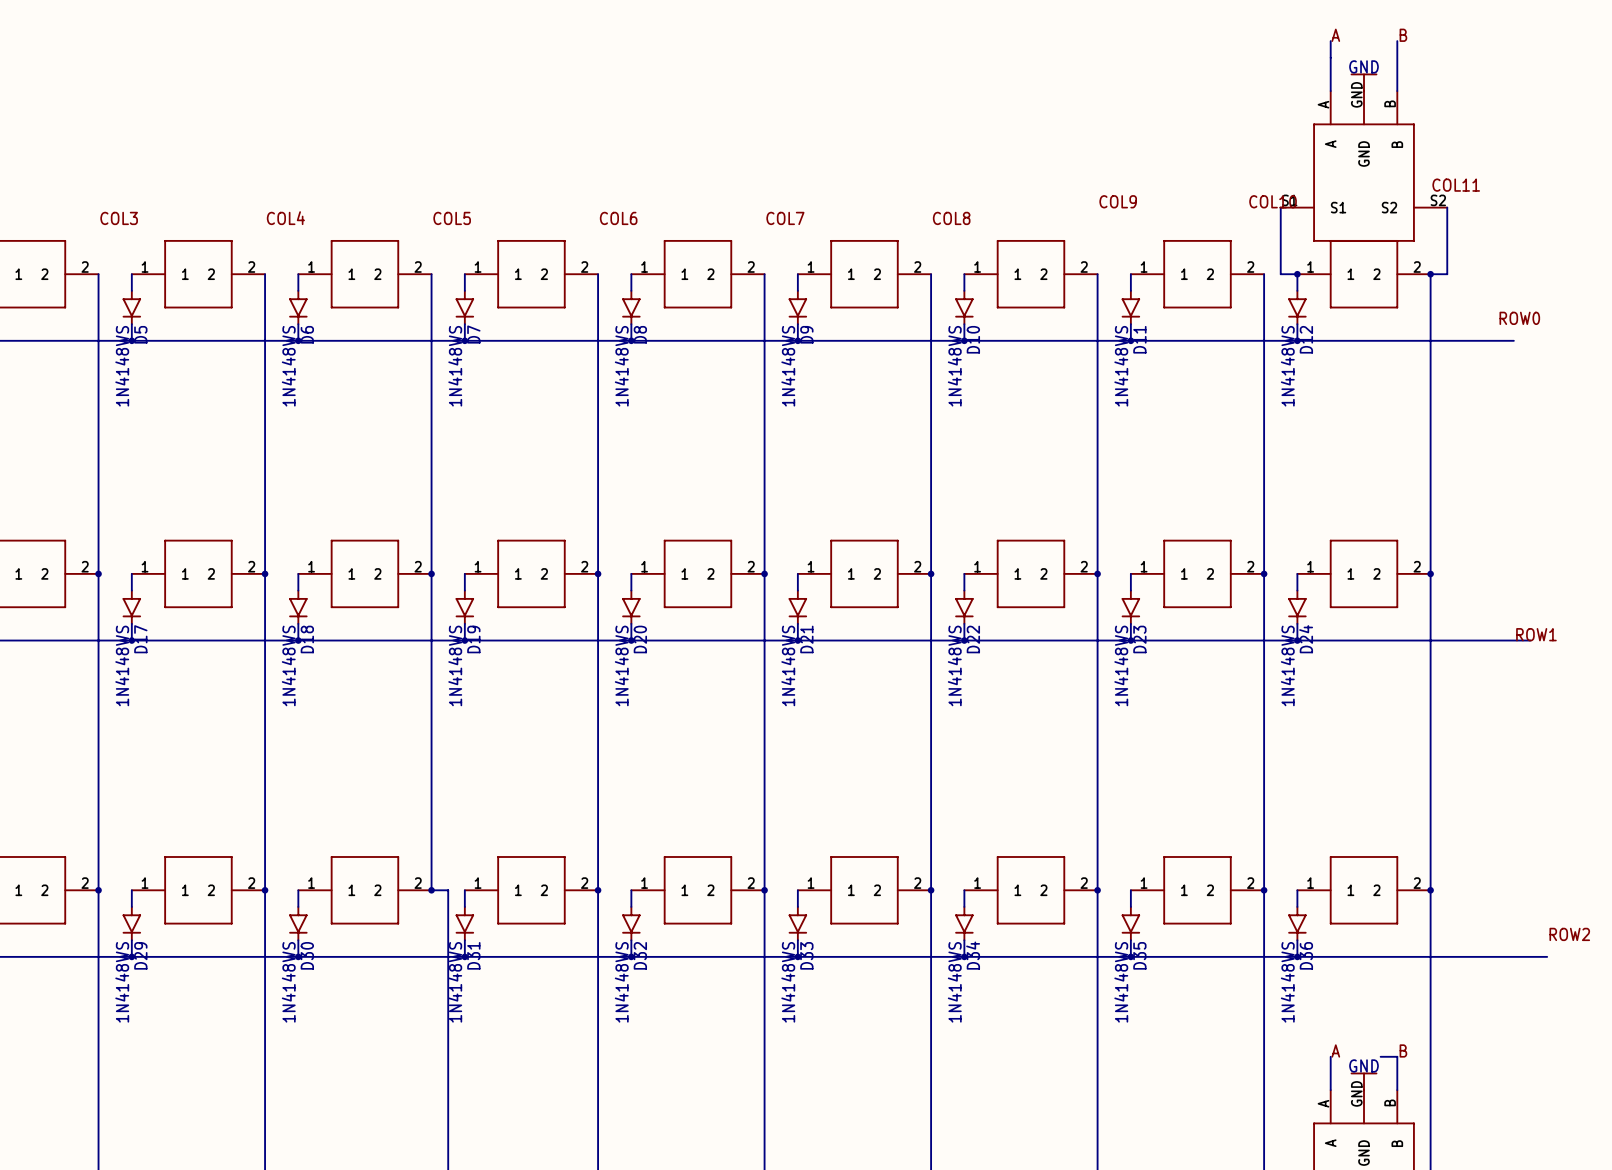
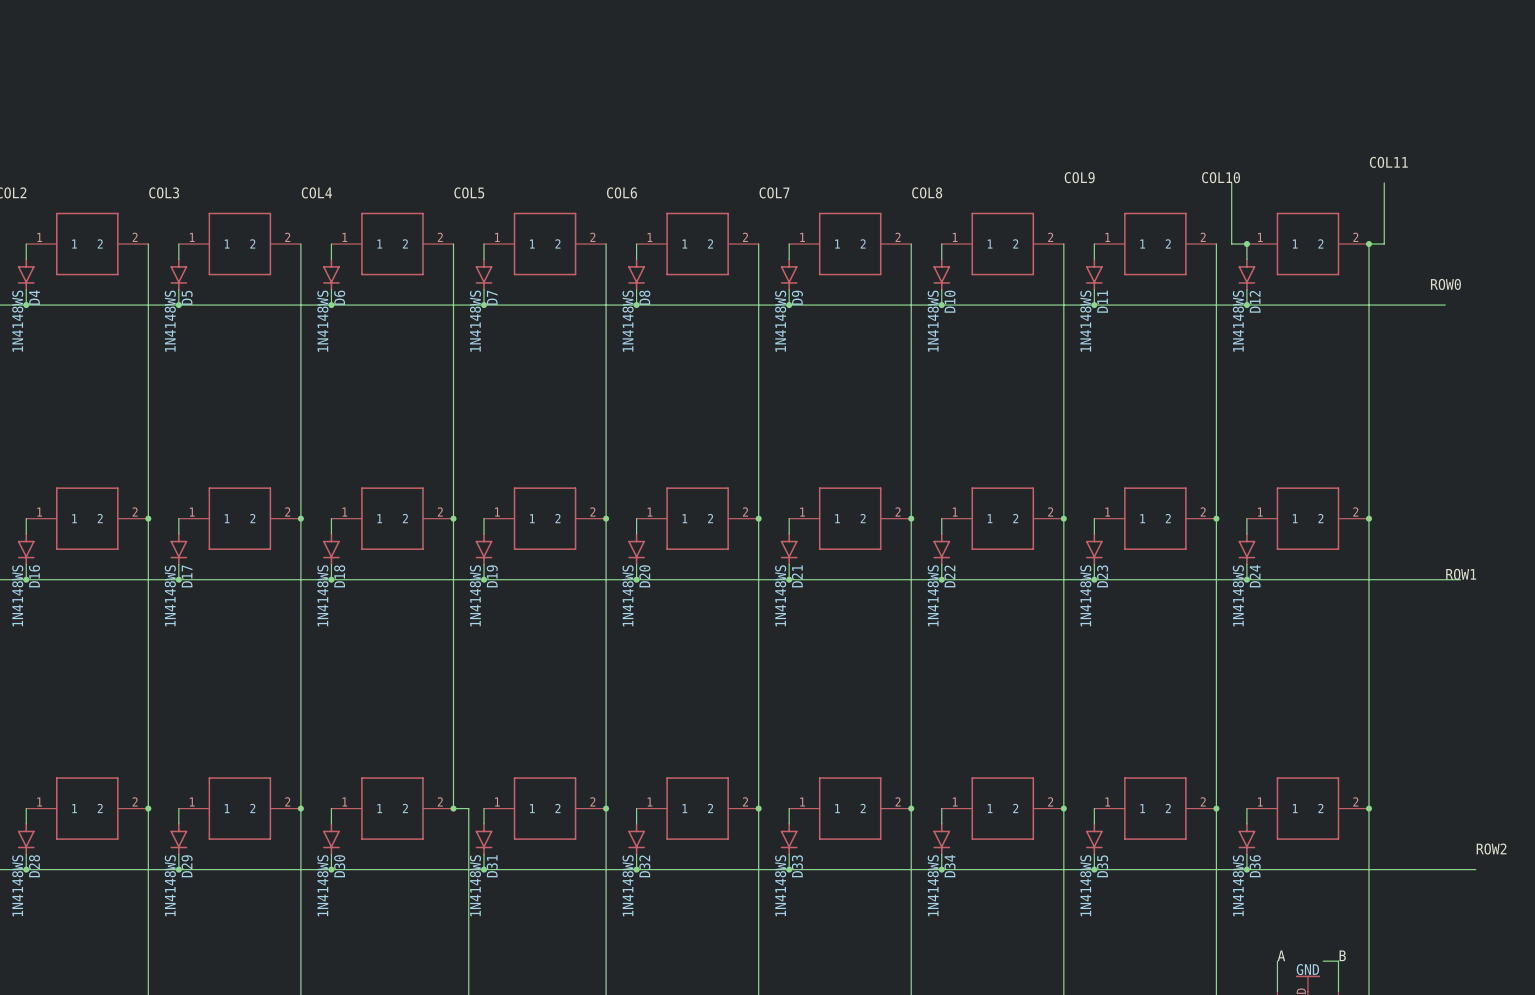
label: A (1335, 35) -> none
label: B (1403, 35) -> none
wire: (1330, 41) (1330, 91) -> none
wire: (1397, 41) (1397, 91) -> none
power symbol: GND (1364, 82) -> none
part: (1364, 166) -> none

